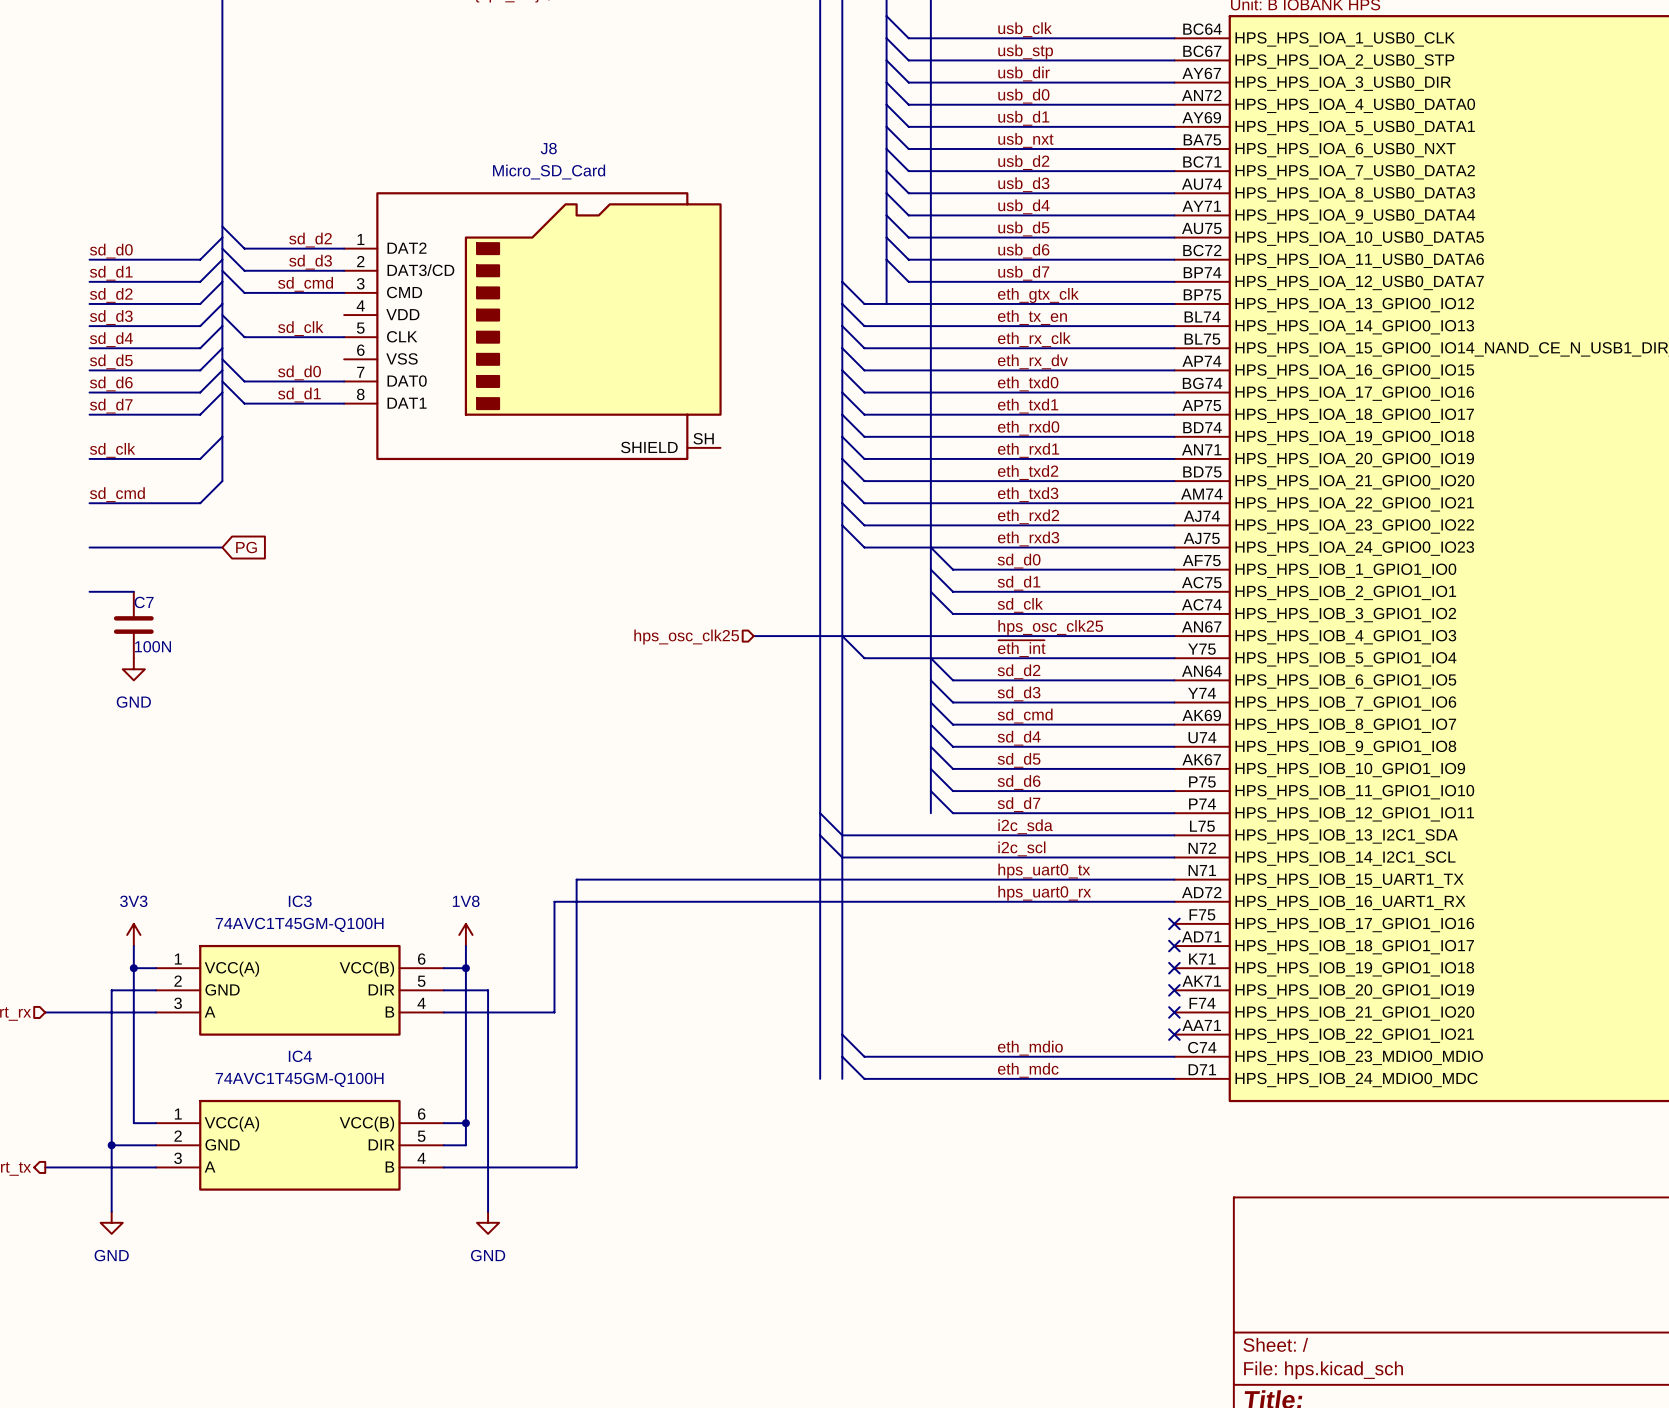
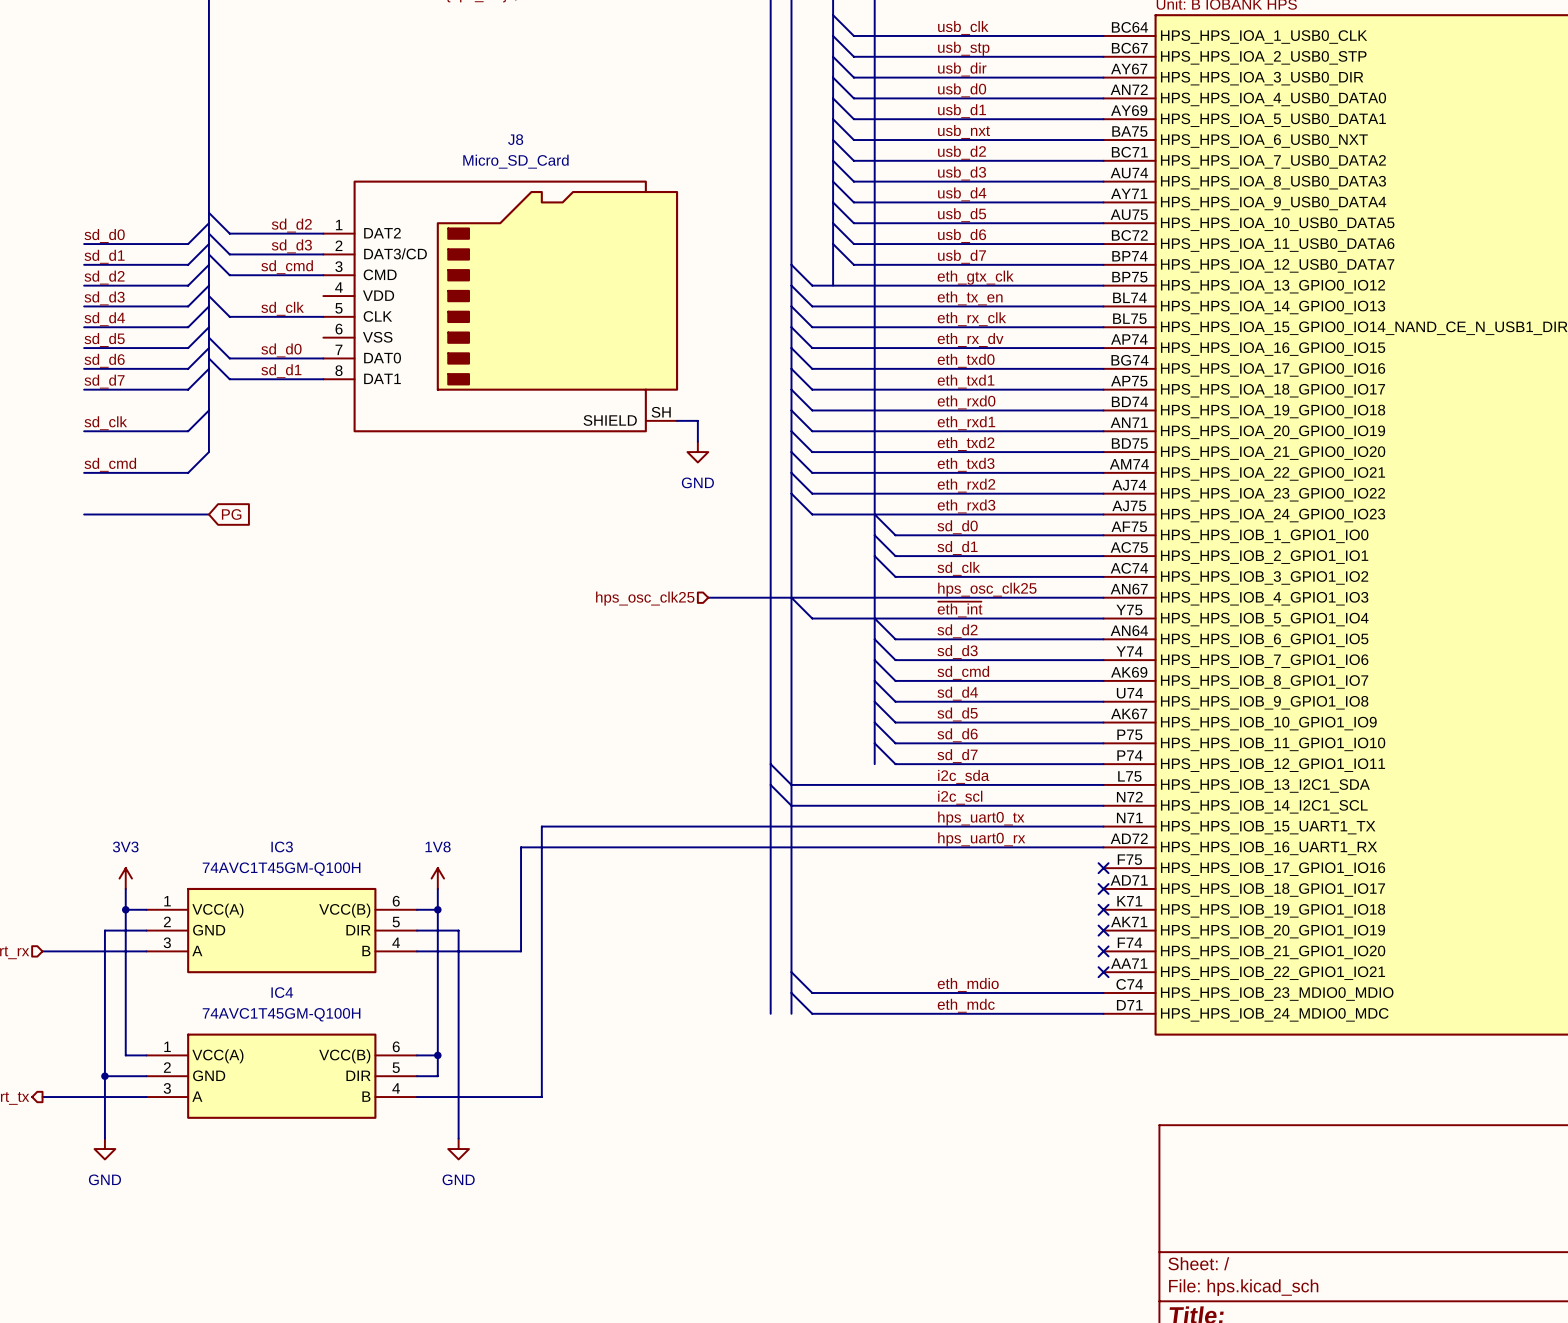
wire: none -> (677, 420) (697, 420) (697, 441)
power symbol: none -> GND (697, 452)
wire: (89, 591) (133, 591) -> none
C7: 100N (133, 625) -> none
power symbol: GND (133, 669) -> none

